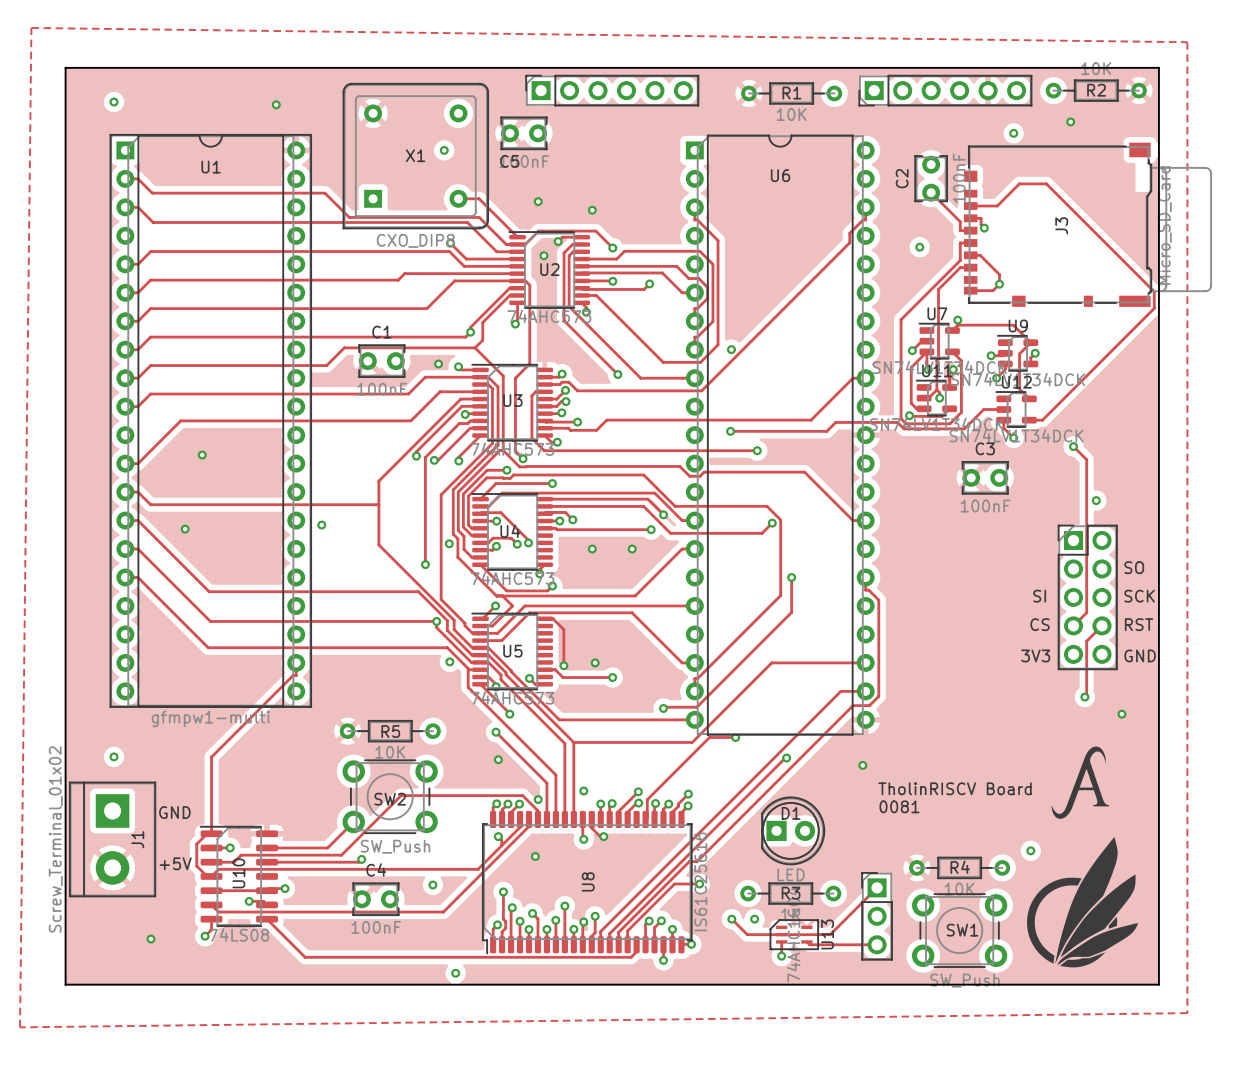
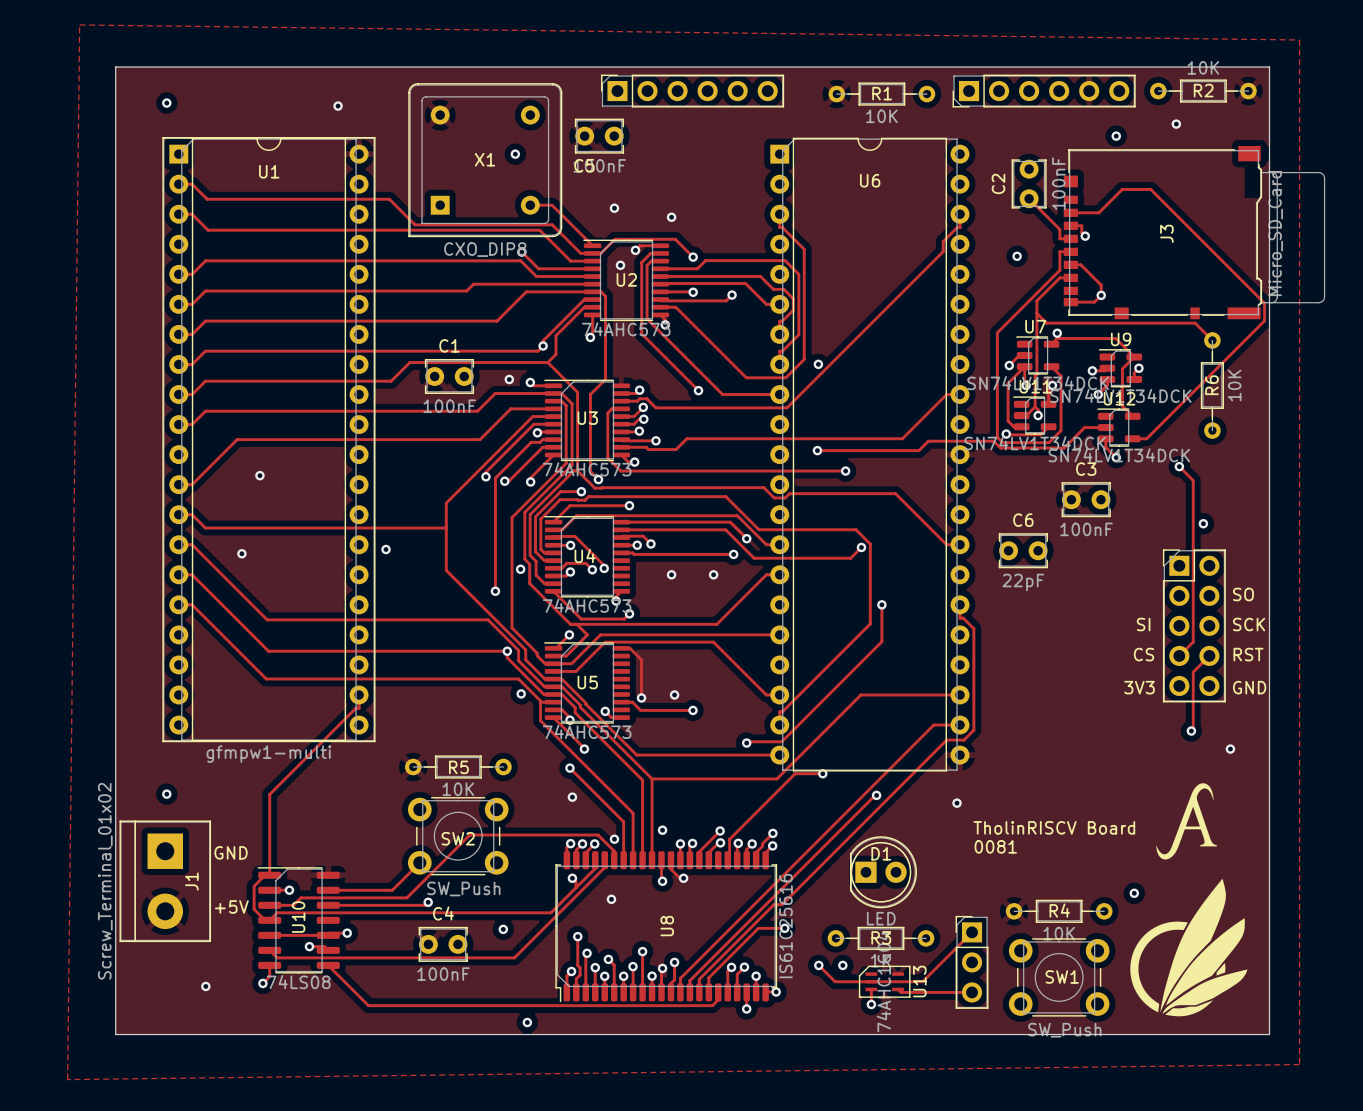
track: none -> (1036, 313) (1046, 323) (1195, 323) (1212, 340)
R6: none -> 10K (1212, 385)
C6: none -> 22pF (1023, 550)

